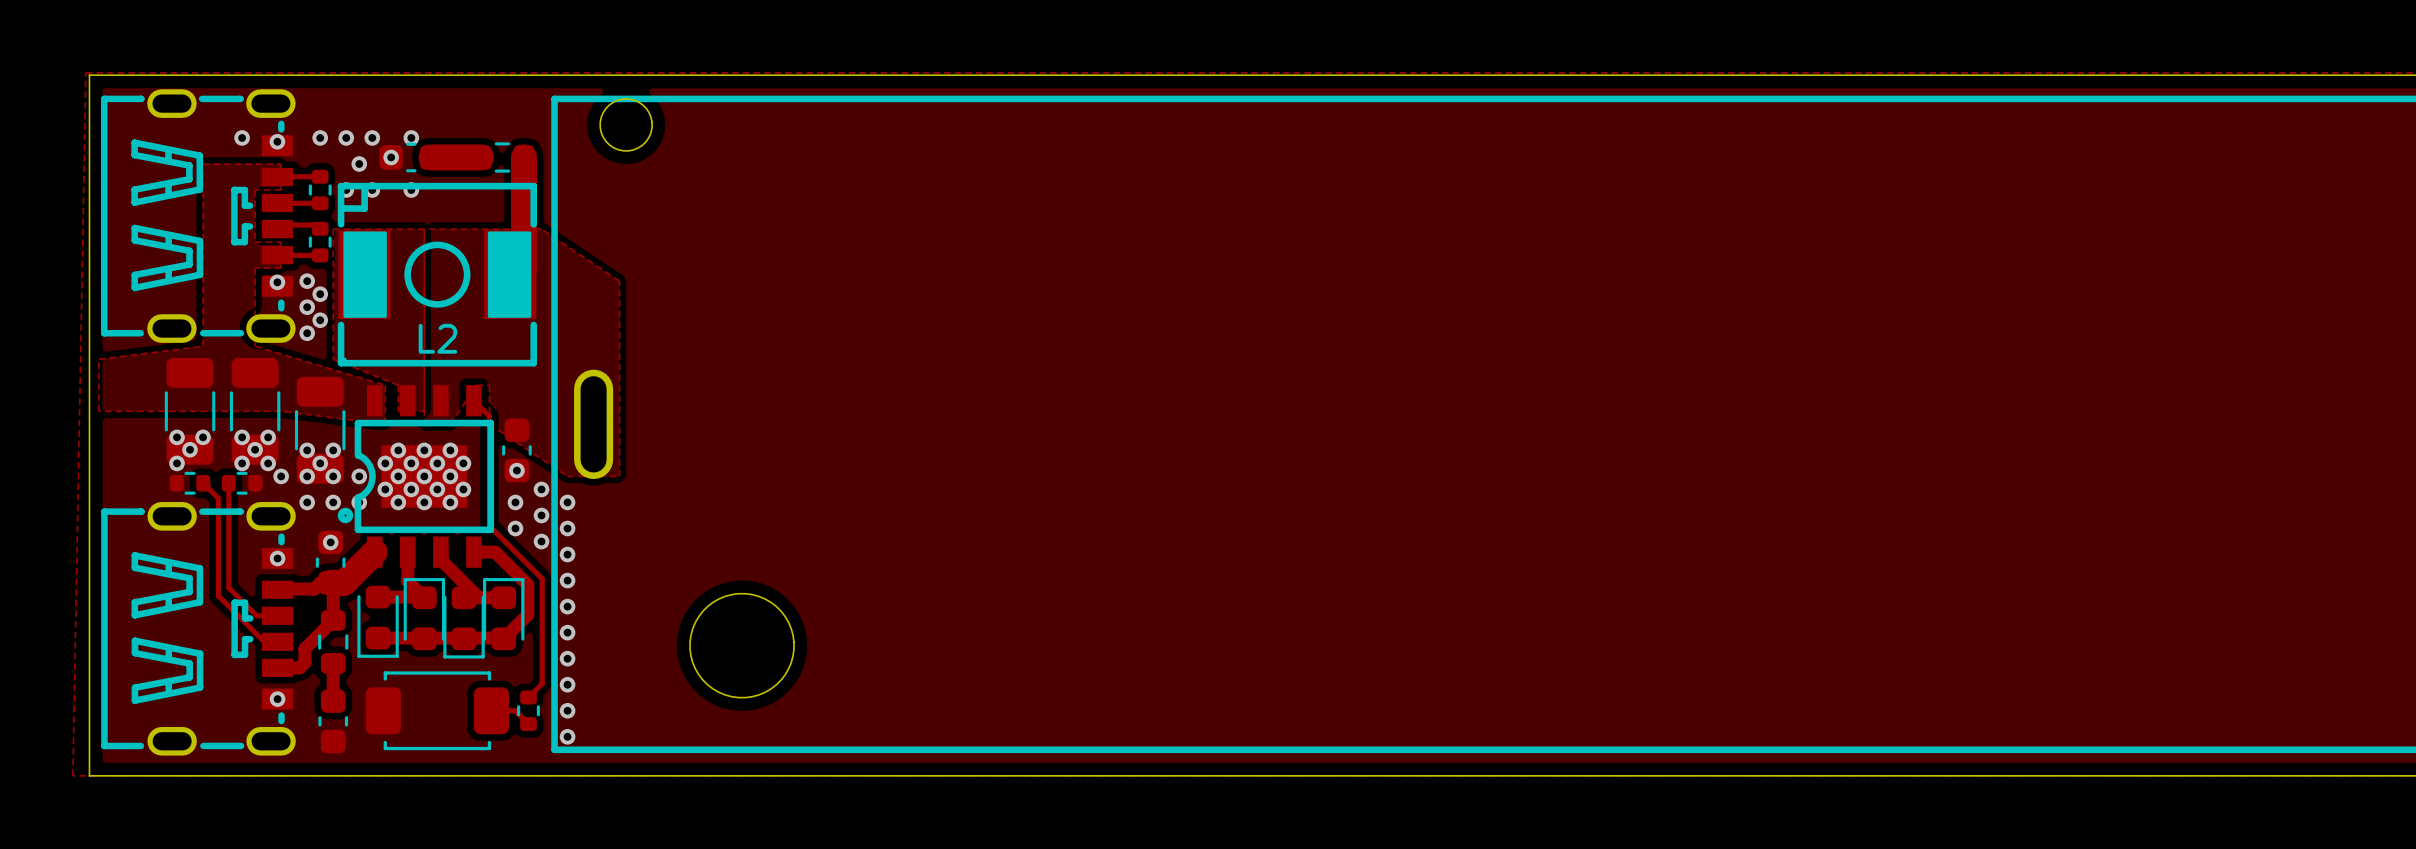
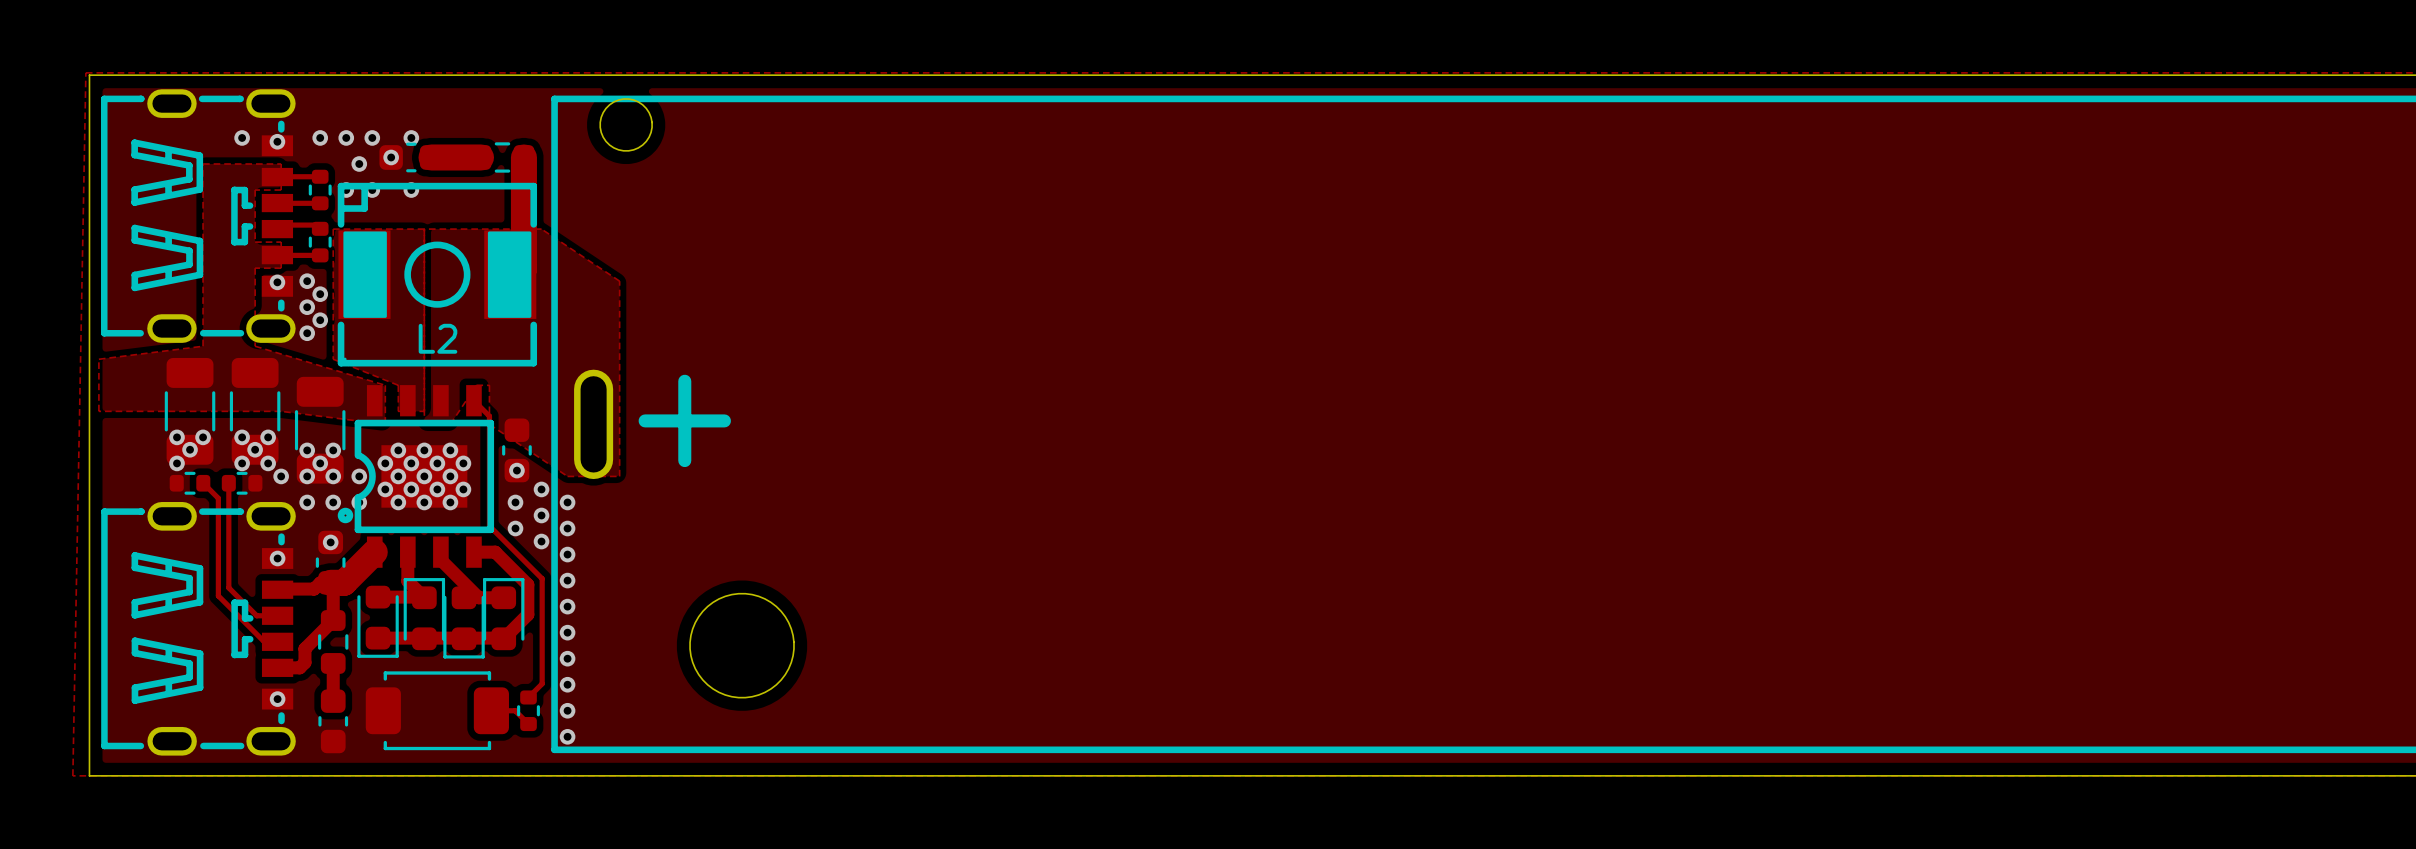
text: none -> + (684, 420)

